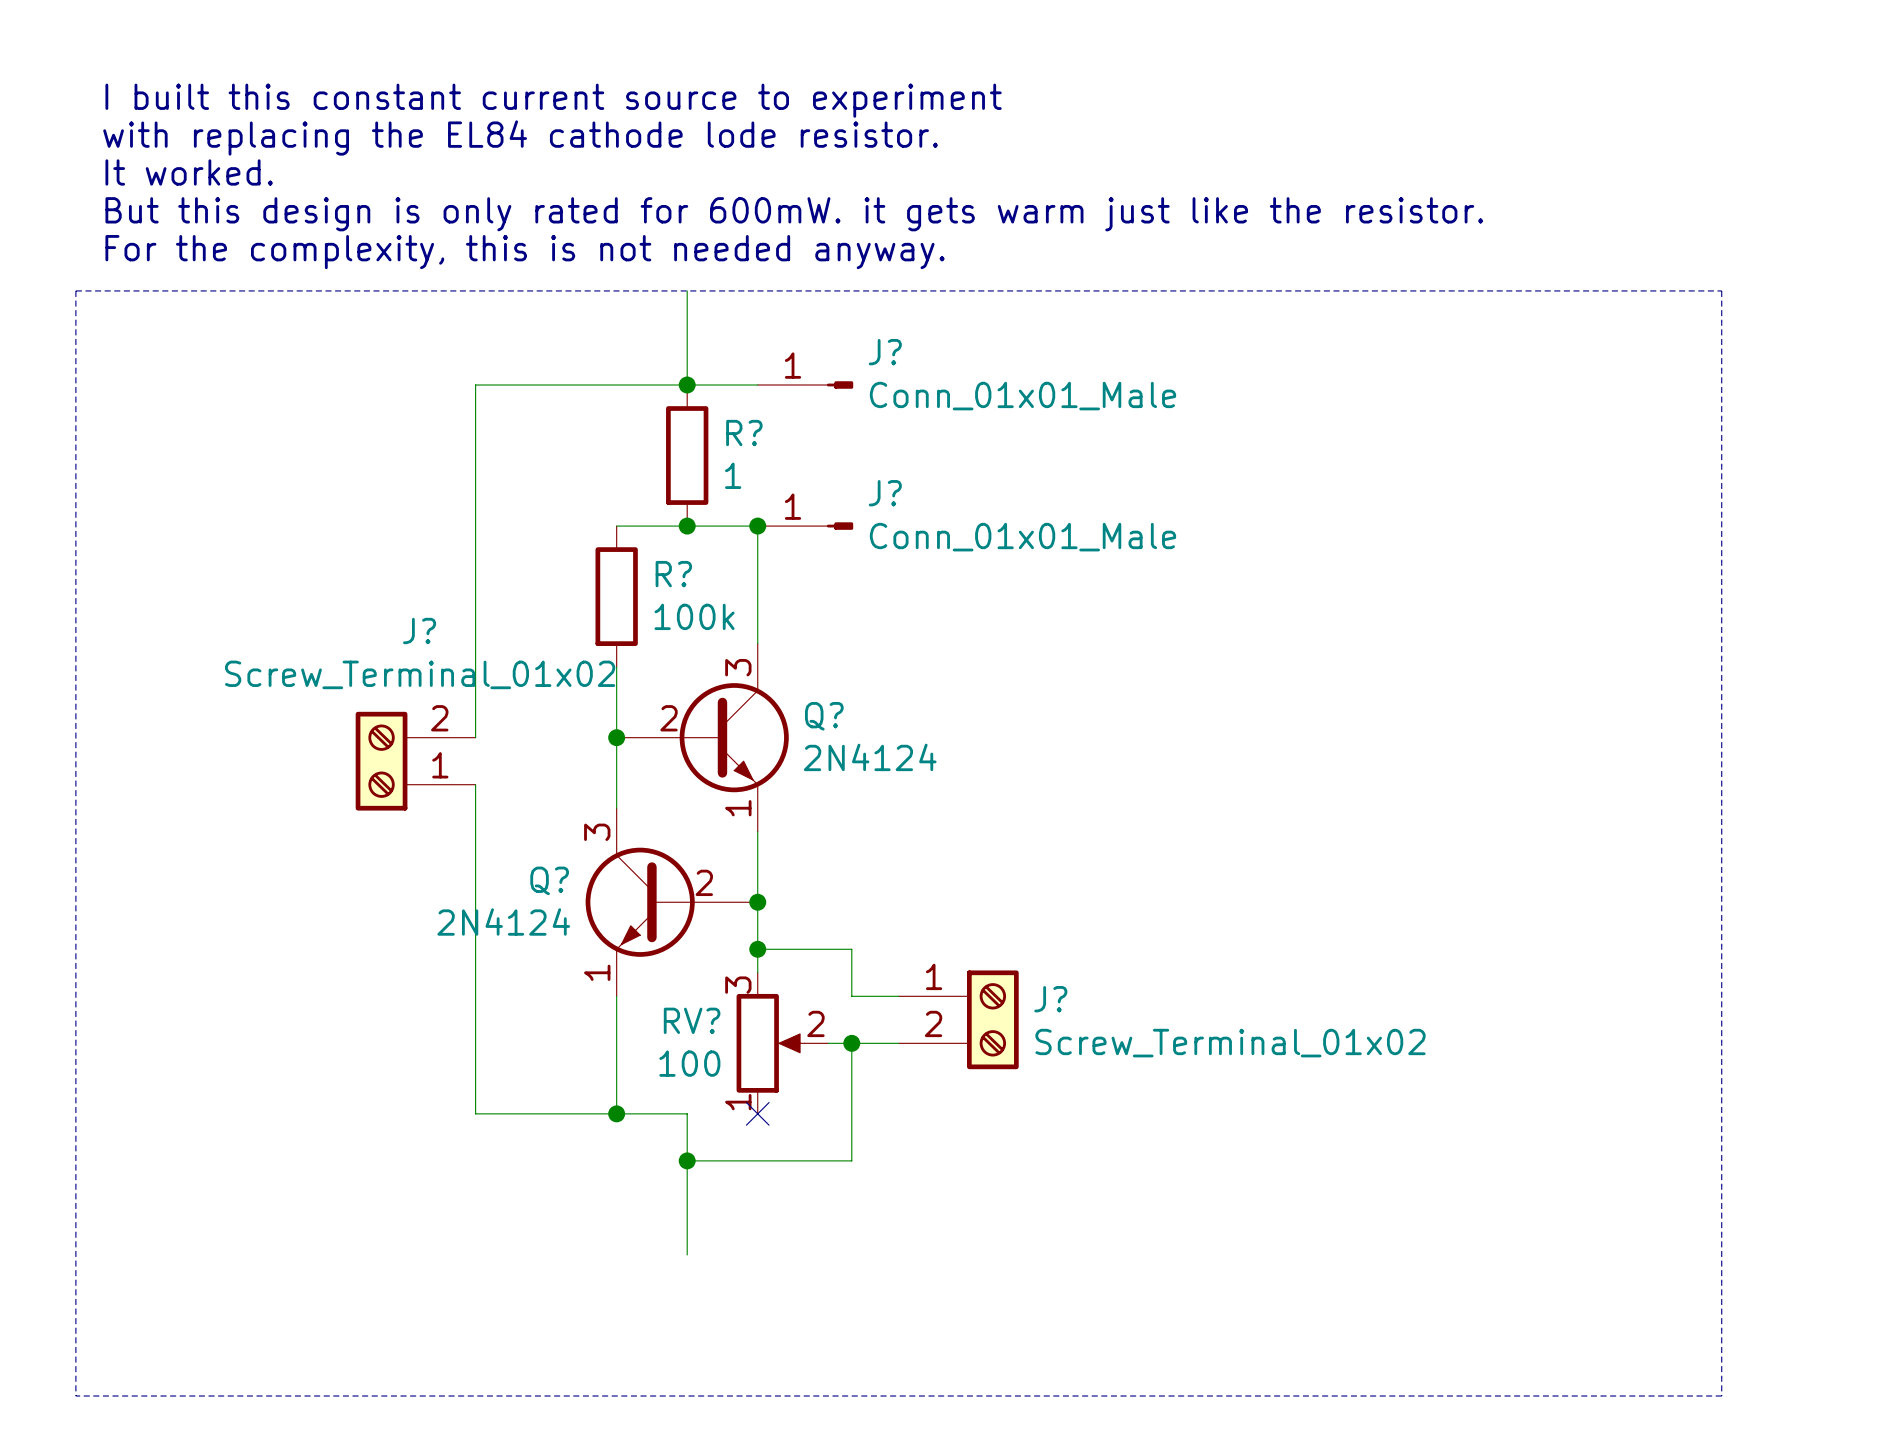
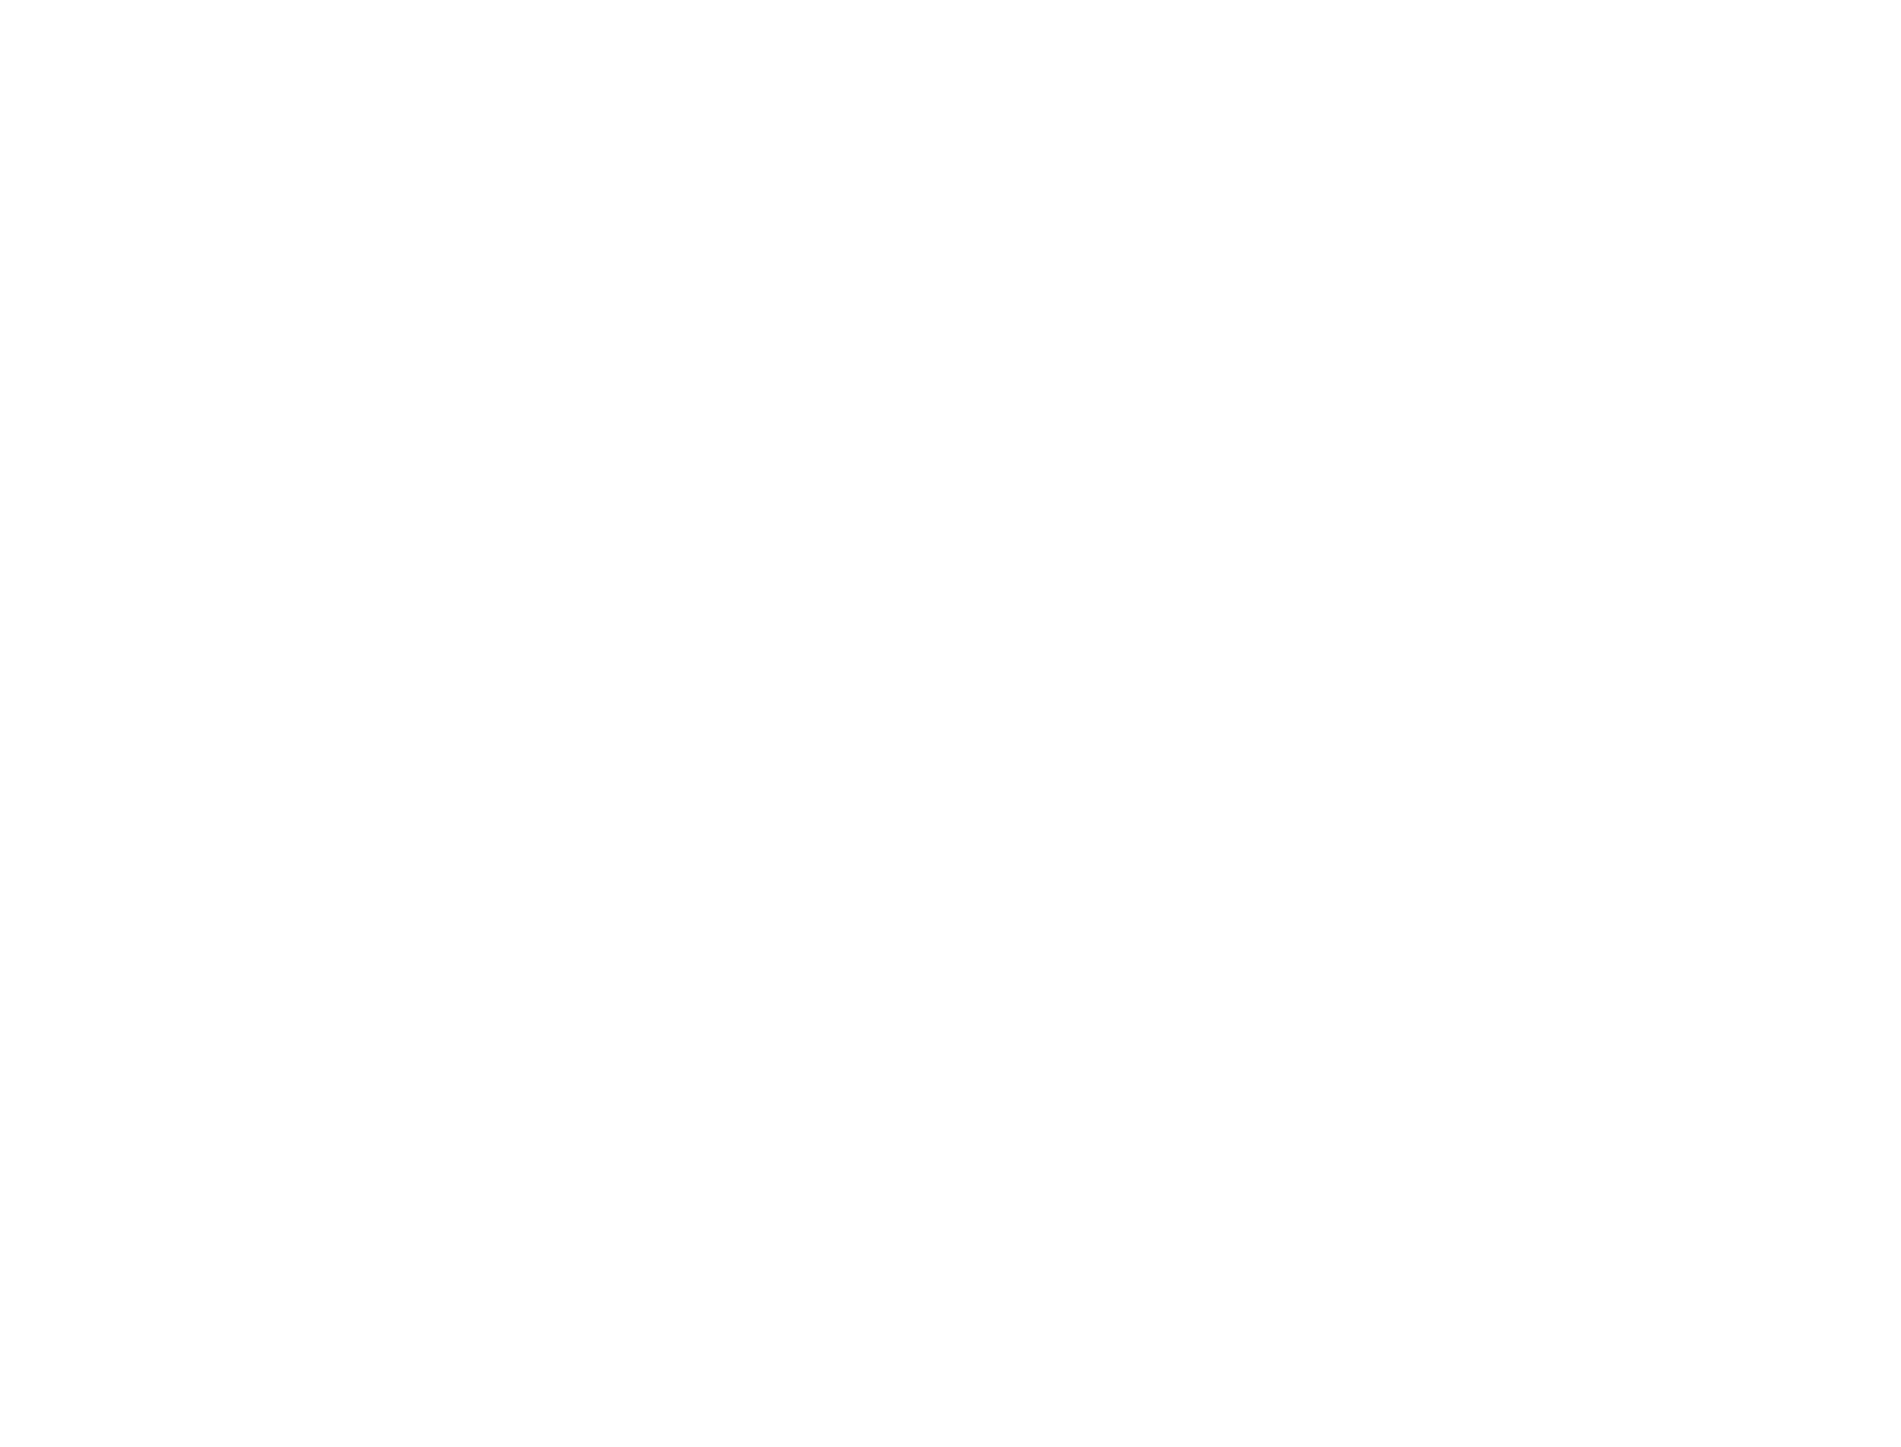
text: I built this constant current source to experiment (553, 100) -> none
text: with replacing the EL84 cathode lode resistor. (520, 137) -> none
text: It worked. (189, 172) -> none
text: But this design is only rated for 600mW. it gets warm just like the resistor. (794, 214) -> none
text: For the complexity, this is not needed anyway. (525, 252) -> none
line: (75, 290) (1721, 290) (1721, 1396) (75, 1396) (75, 290) -> none
wire: (687, 290) (687, 385) -> none
junction: (687, 385) -> none
wire: (757, 385) (475, 385) (475, 737) -> none
J?: Conn_01x01_Male (805, 385) -> none
R?: 1 (687, 455) -> none
wire: (616, 526) (757, 526) (757, 643) -> none
junction: (687, 526) -> none
junction: (757, 526) -> none
J?: Conn_01x01_Male (805, 526) -> none
R?: 100k (616, 596) -> none
wire: (616, 667) (616, 808) -> none
junction: (616, 737) -> none
Q?: 2N4124 (702, 737) -> none
J?: Screw_Terminal_01x02 (415, 761) -> none
wire: (475, 784) (475, 1113) (687, 1113) (687, 1254) -> none
wire: (757, 831) (757, 972) -> none
Q?: 2N4124 (671, 902) -> none
junction: (757, 902) -> none
wire: (757, 949) (851, 949) (851, 996) (898, 996) -> none
junction: (757, 949) -> none
wire: (616, 996) (616, 1113) -> none
J?: Screw_Terminal_01x02 (958, 1019) -> none
RV?: 100 (782, 1043) -> none
wire: (828, 1043) (898, 1043) -> none
wire: (851, 1043) (851, 1160) (687, 1160) -> none
junction: (851, 1043) -> none
junction: (616, 1113) -> none
no-connect mark: (757, 1113) -> none
junction: (687, 1160) -> none

